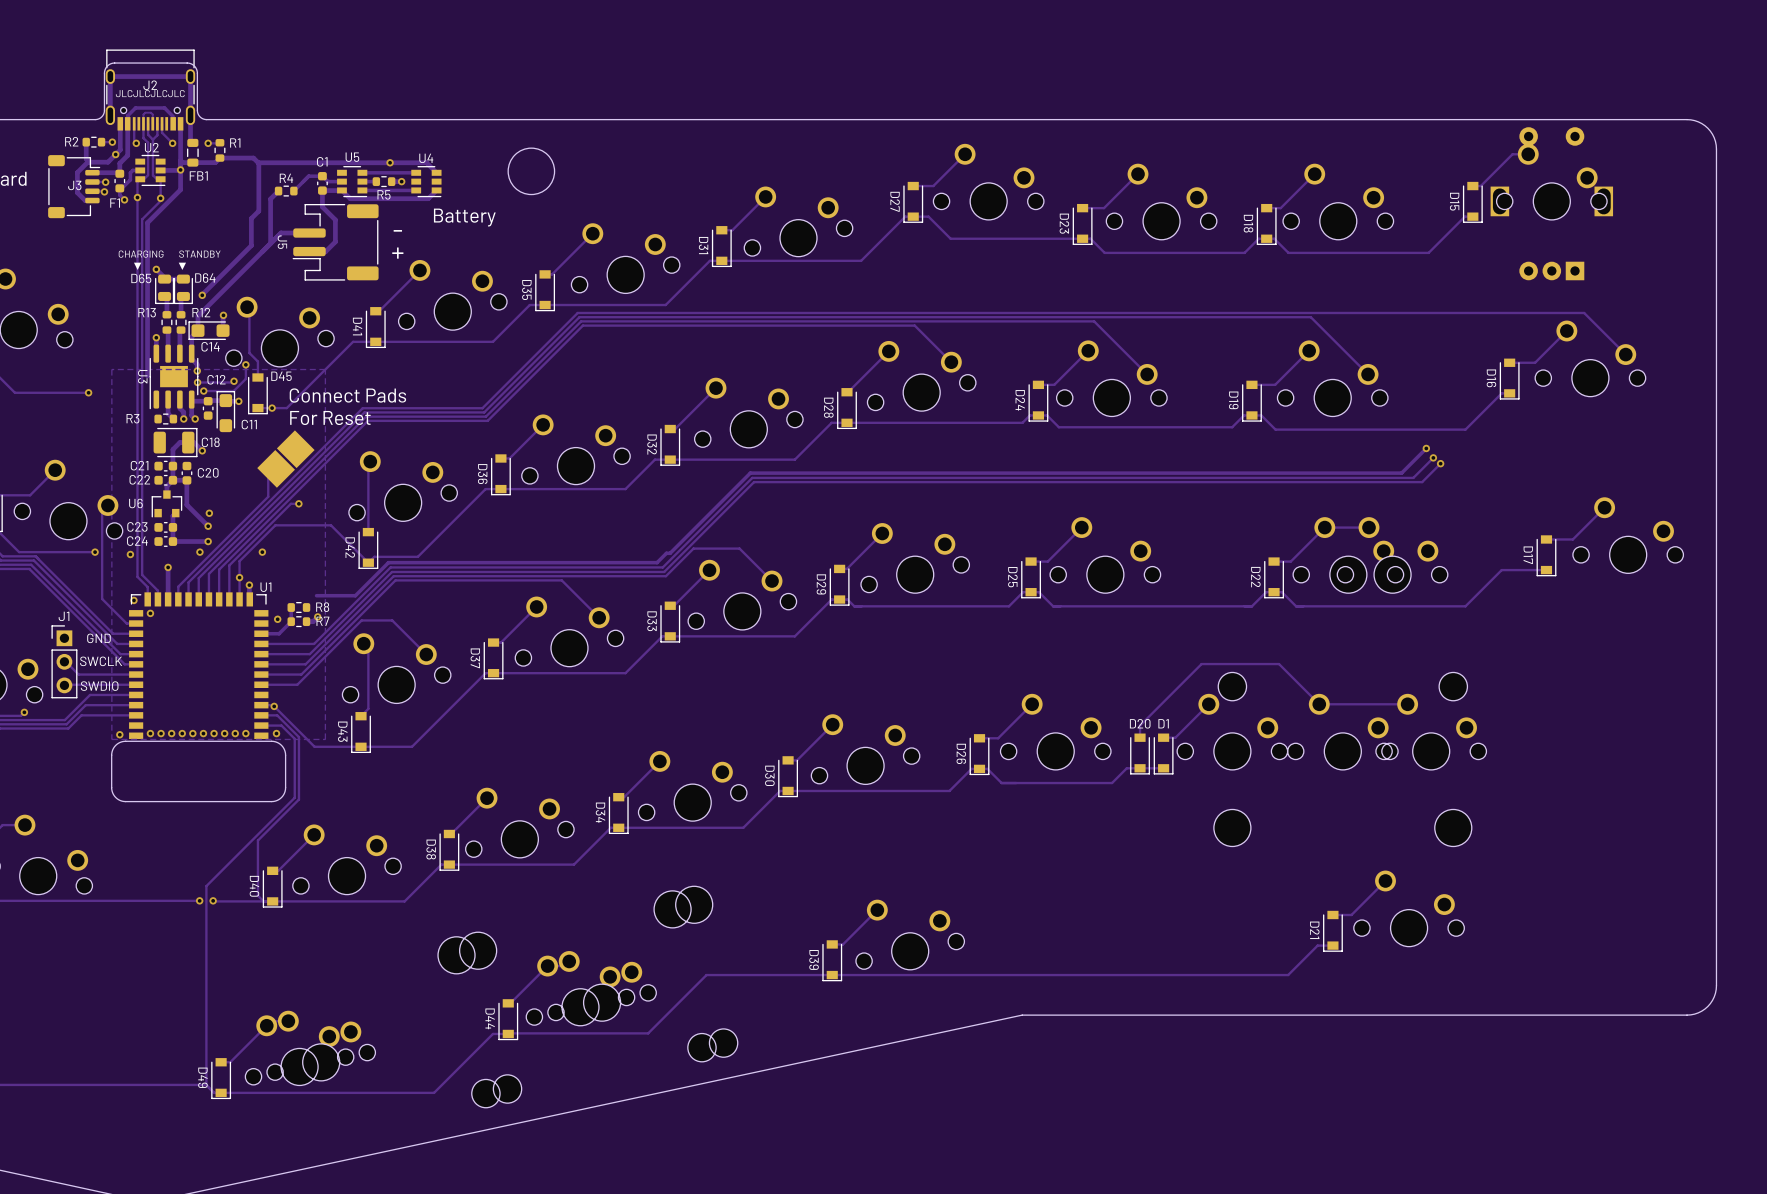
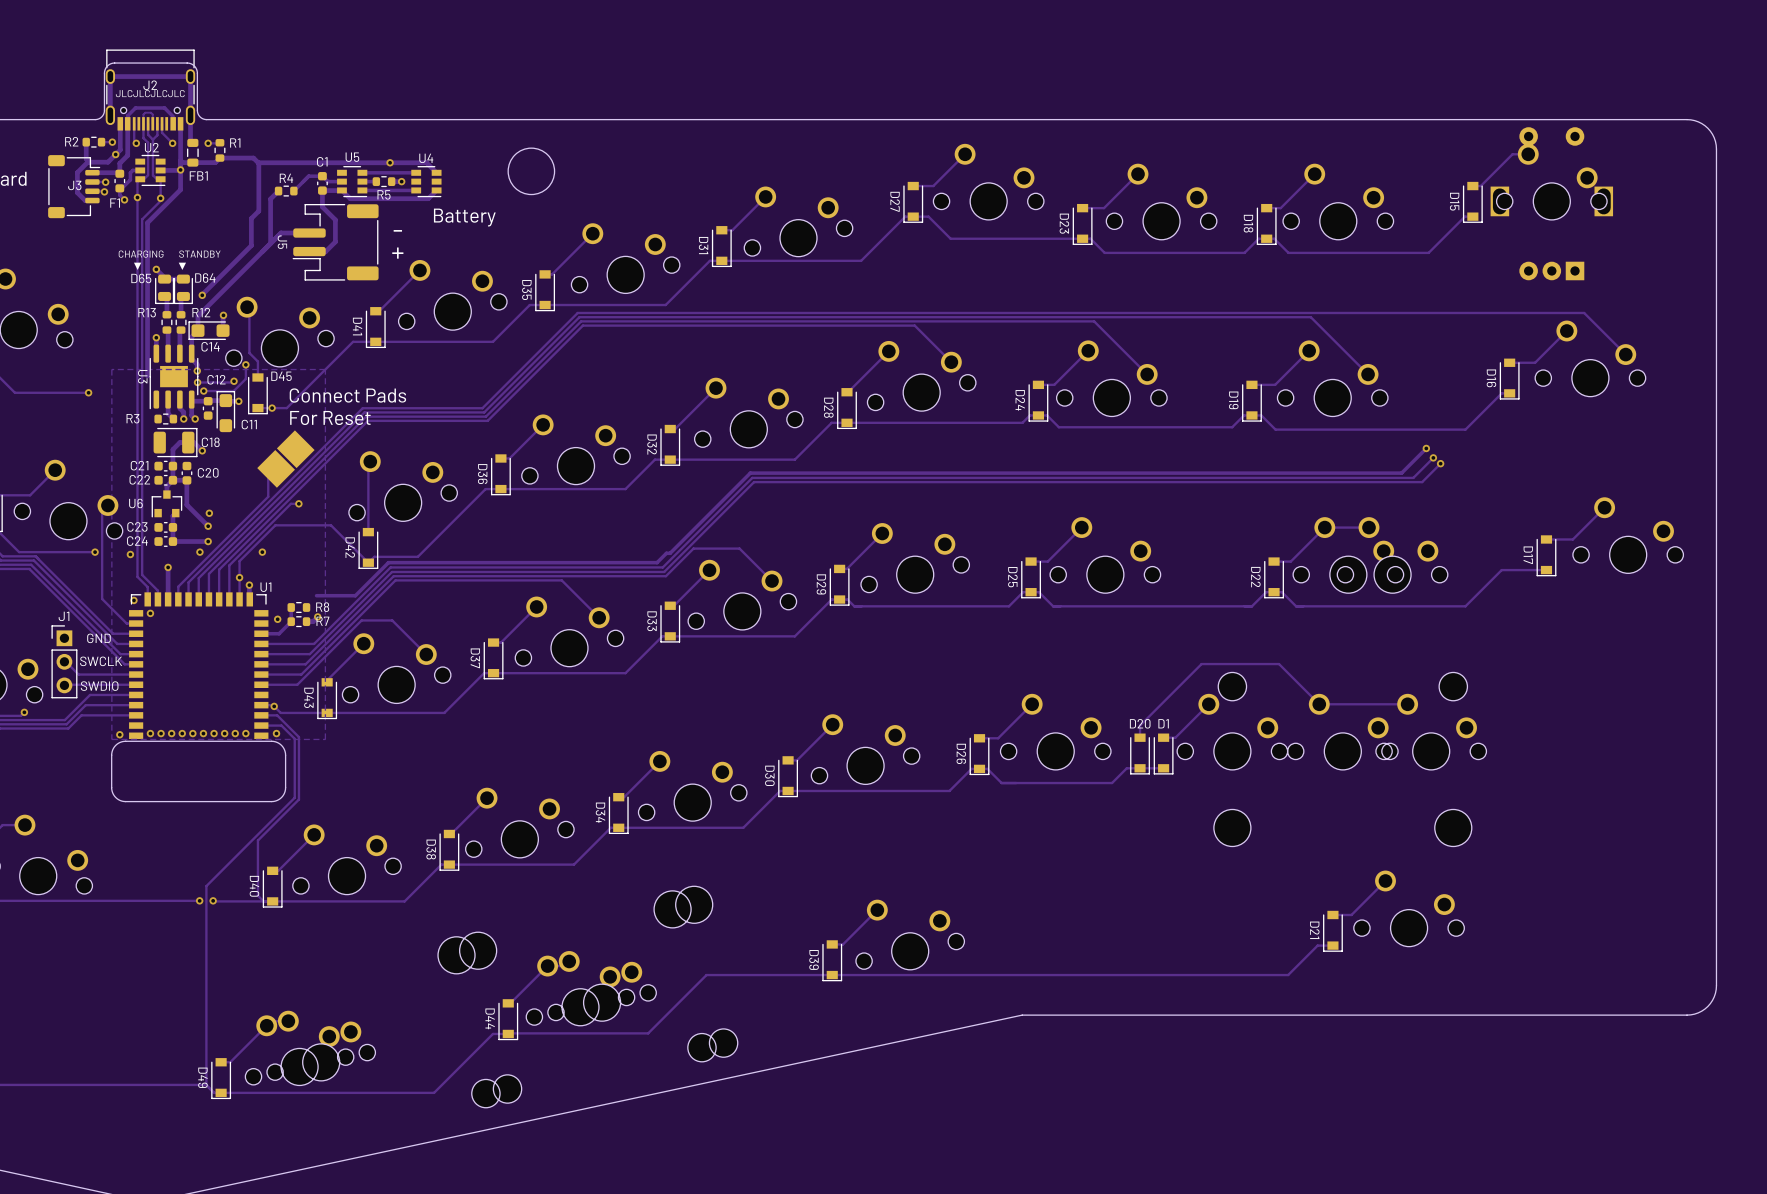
track: (363, 643) (368, 648) (368, 708) (361, 716) -> (363, 643) (327, 682)
track: (485, 673) (411, 746) (314, 746) (280, 712) -> (485, 673) (444, 712) (280, 712)
D43 position: (361, 732) -> (327, 698)

